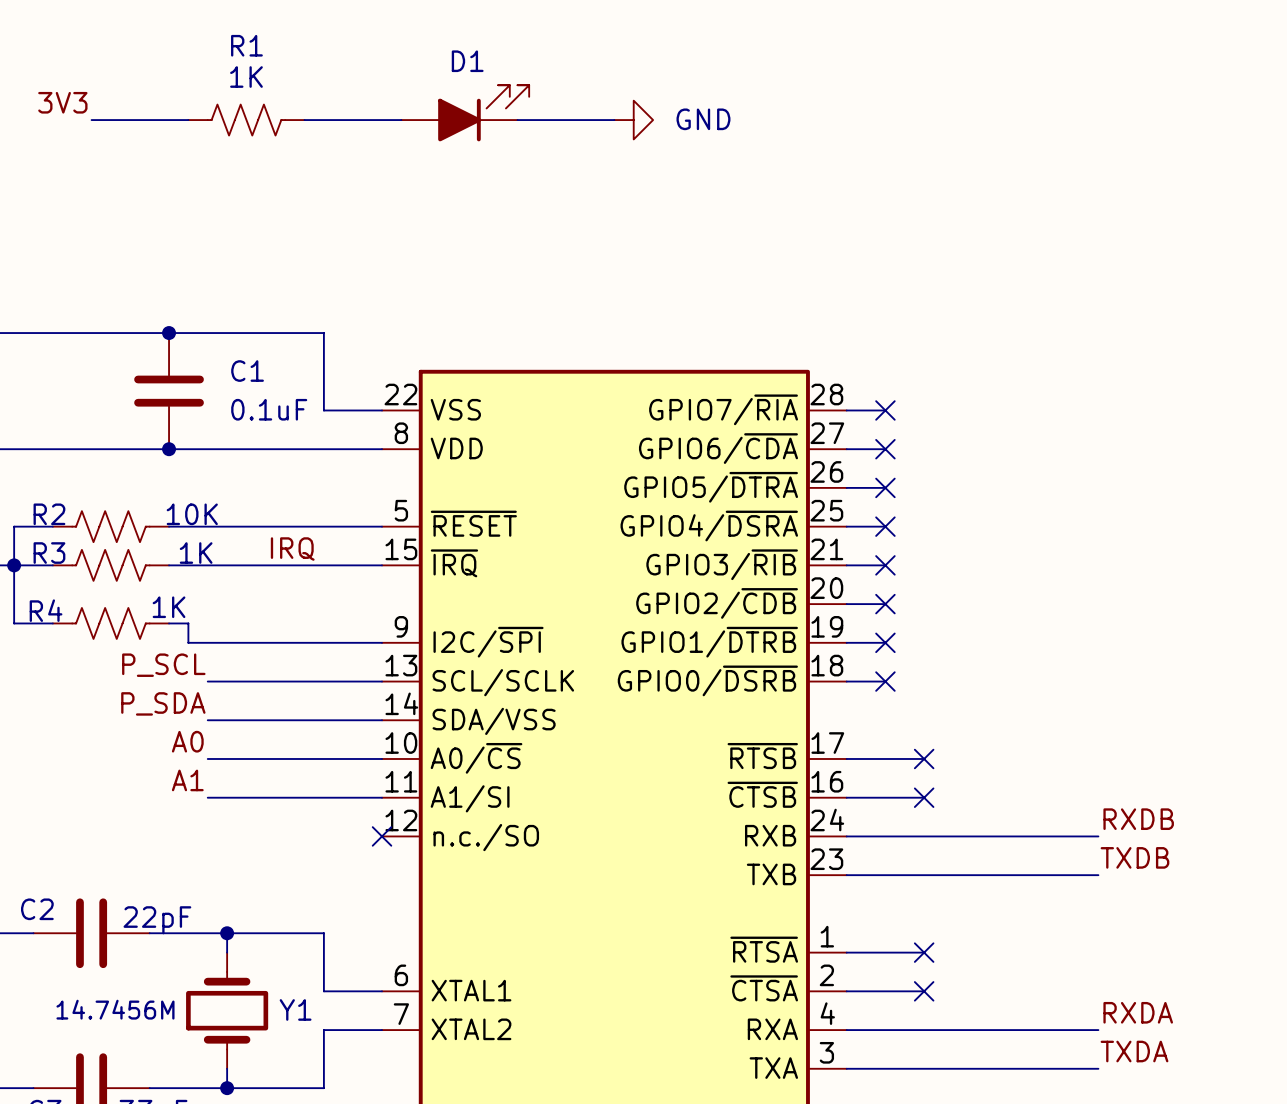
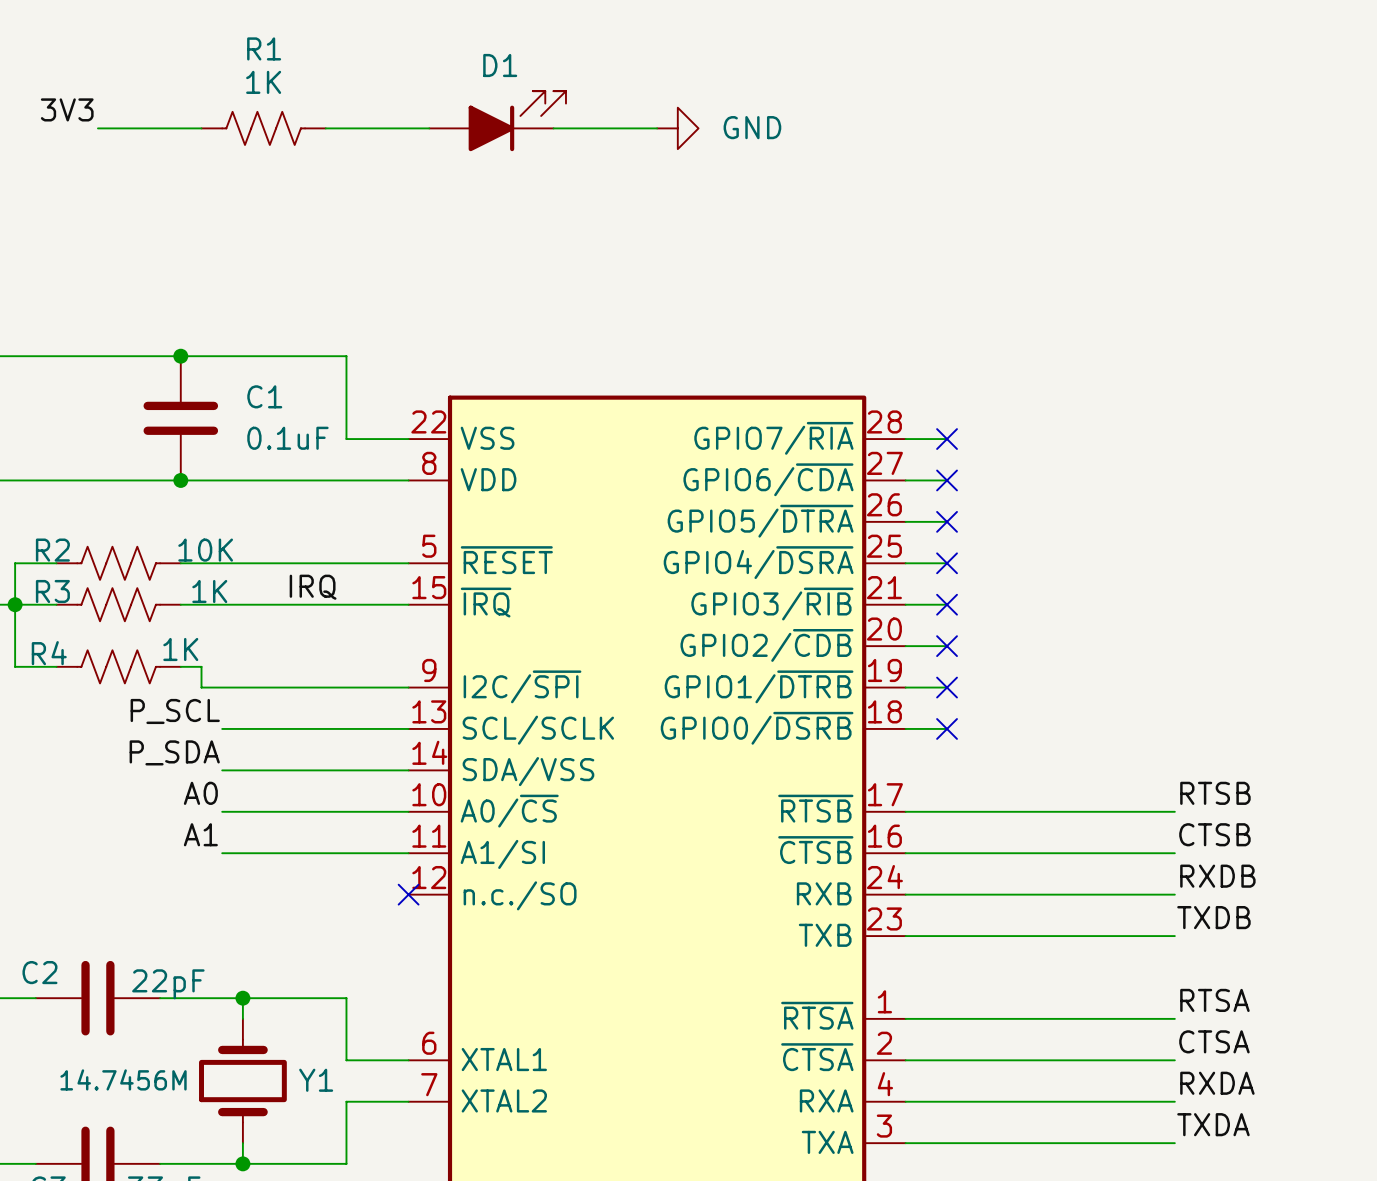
label: none -> RTSB (1215, 793)
wire: none -> (988, 811) (1174, 811)
no-connect mark: (924, 758) -> none
label: none -> CTSB (1214, 834)
wire: none -> (988, 853) (1174, 853)
no-connect mark: (924, 797) -> none
label: none -> RTSA (1214, 1000)
wire: none -> (988, 1018) (1174, 1018)
no-connect mark: (924, 952) -> none
label: none -> CTSA (1214, 1041)
wire: none -> (988, 1060) (1174, 1060)
no-connect mark: (924, 991) -> none

